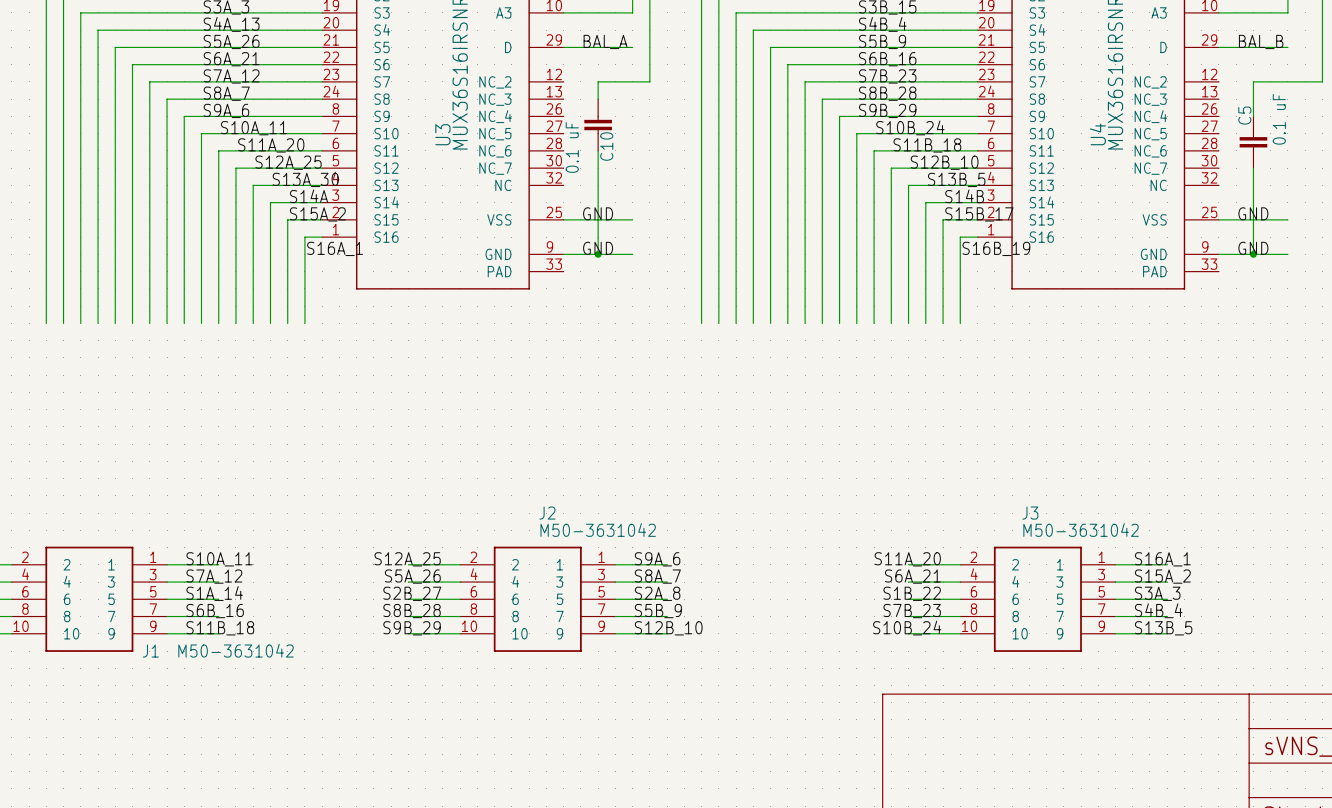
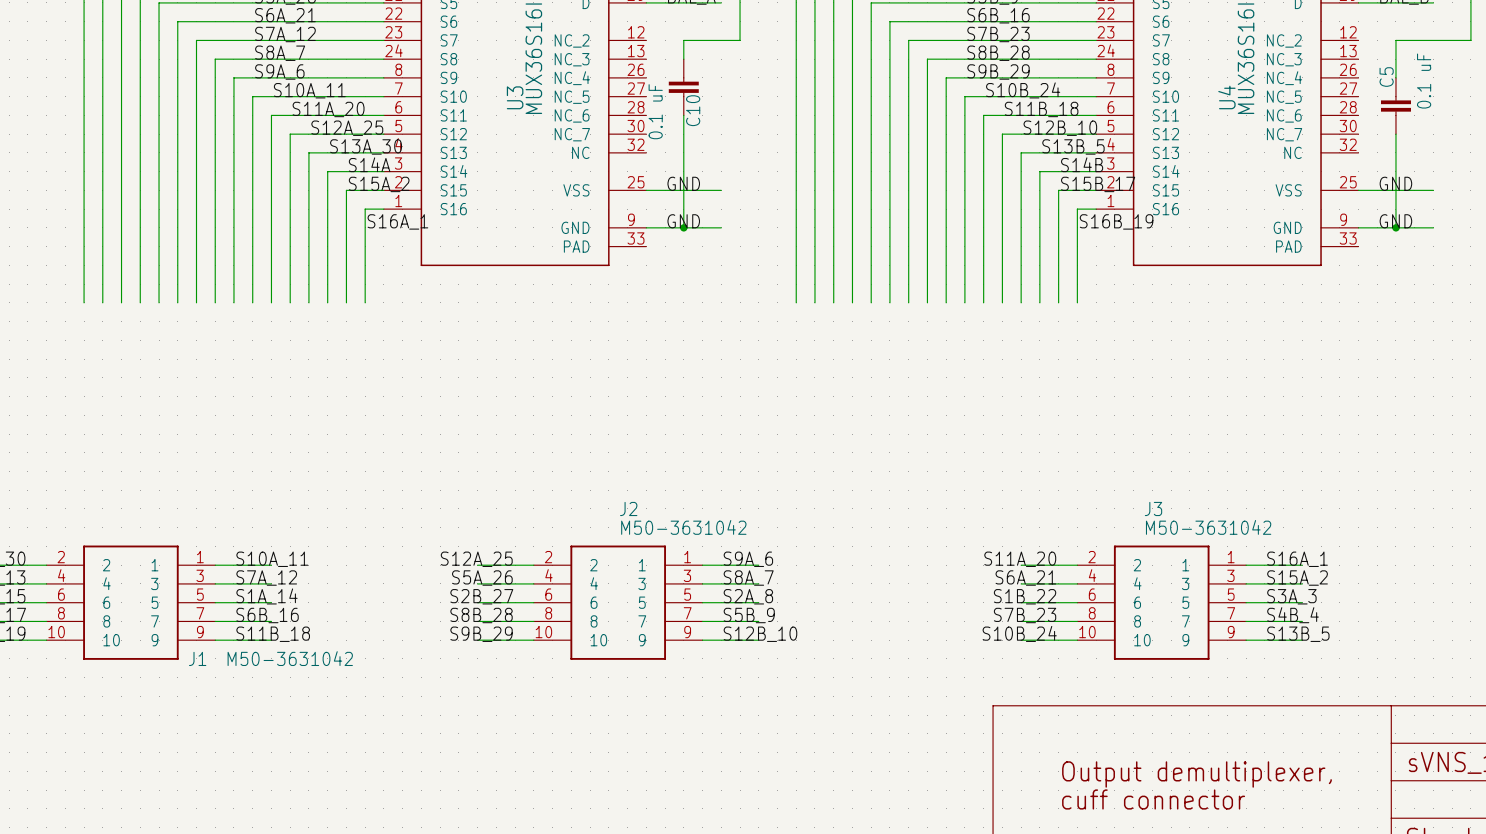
text: none -> Output demultiplexer, (1196, 774)
text: none -> cuff connector (1153, 799)

